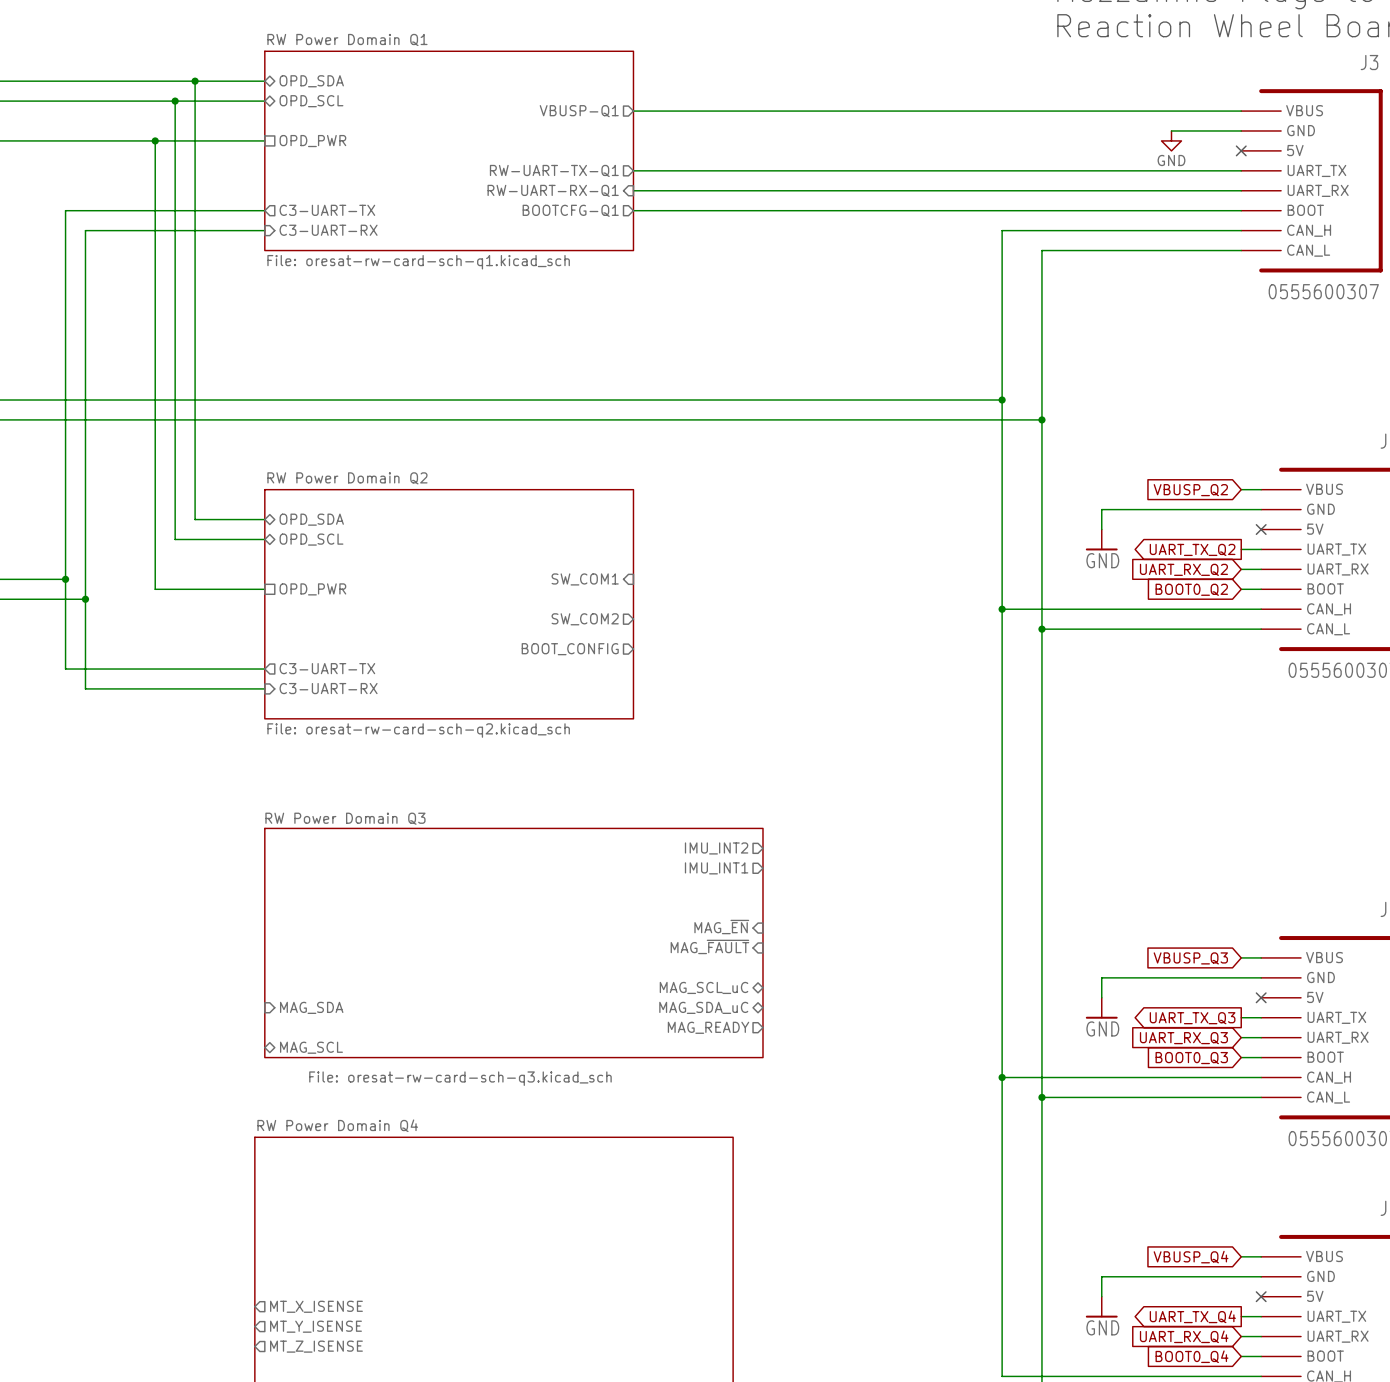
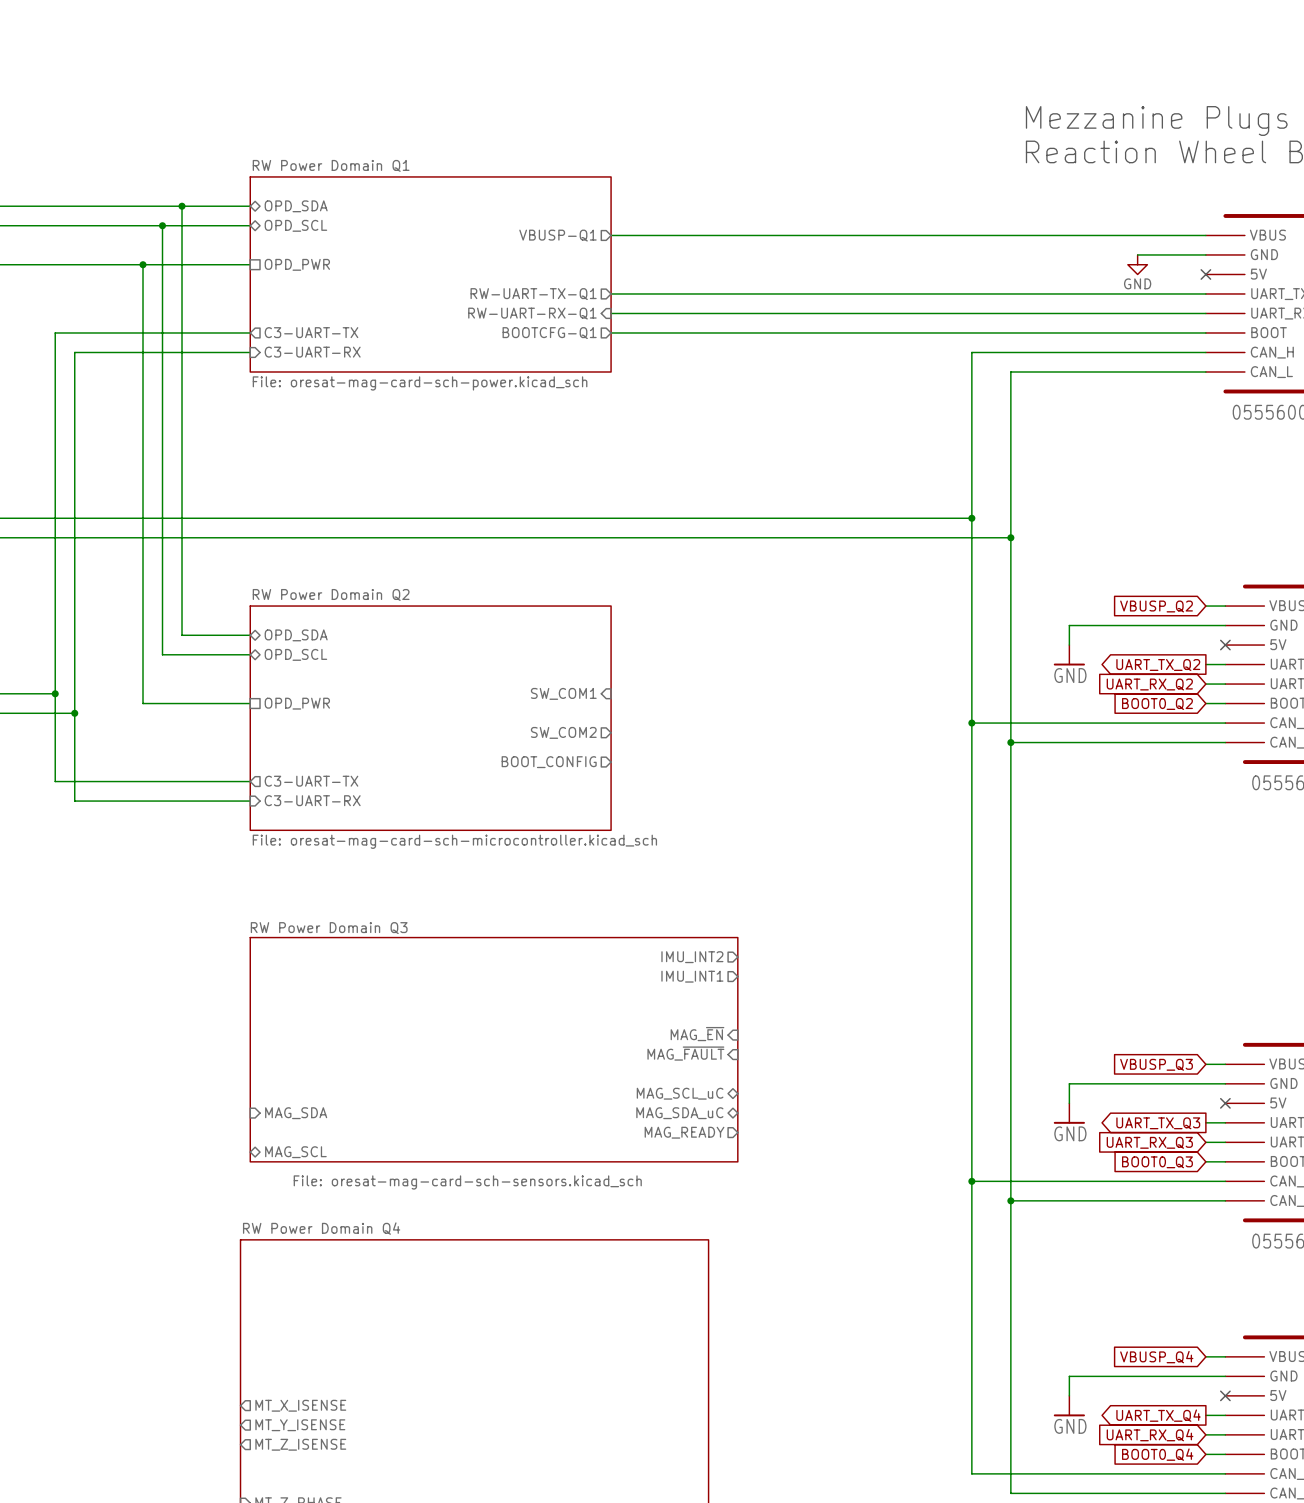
sheet RW Power Domain Q1 value: File: oresat-rw-card-sch-q1.kicad_sch (418, 262) -> File: oresat-mag-card-sch-power.kicad_sch (420, 383)
sheet RW Power Domain Q2 value: File: oresat-rw-card-sch-q2.kicad_sch (418, 730) -> File: oresat-mag-card-sch-microcontroller.kicad_sch (454, 841)
sheet RW Power Domain Q3 value: File: oresat-rw-card-sch-q3.kicad_sch (460, 1078) -> File: oresat-mag-card-sch-sensors.kicad_sch (467, 1182)

